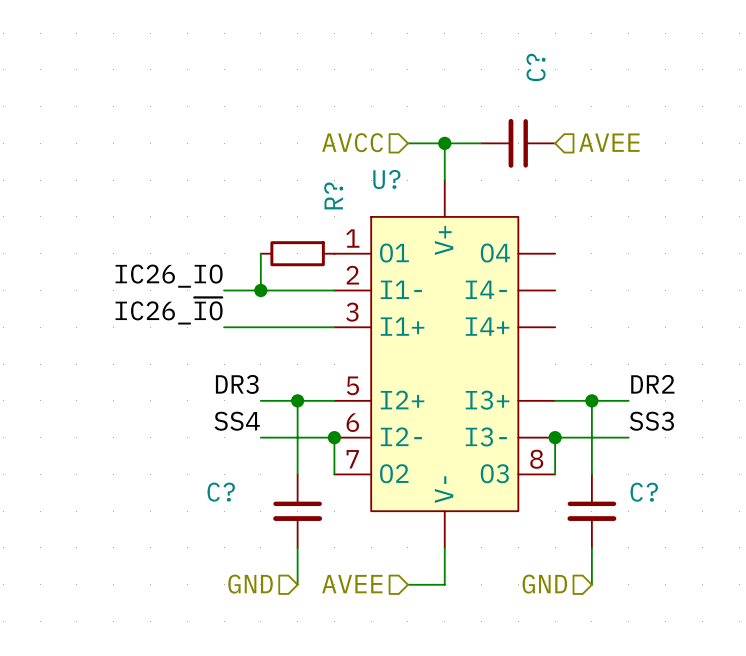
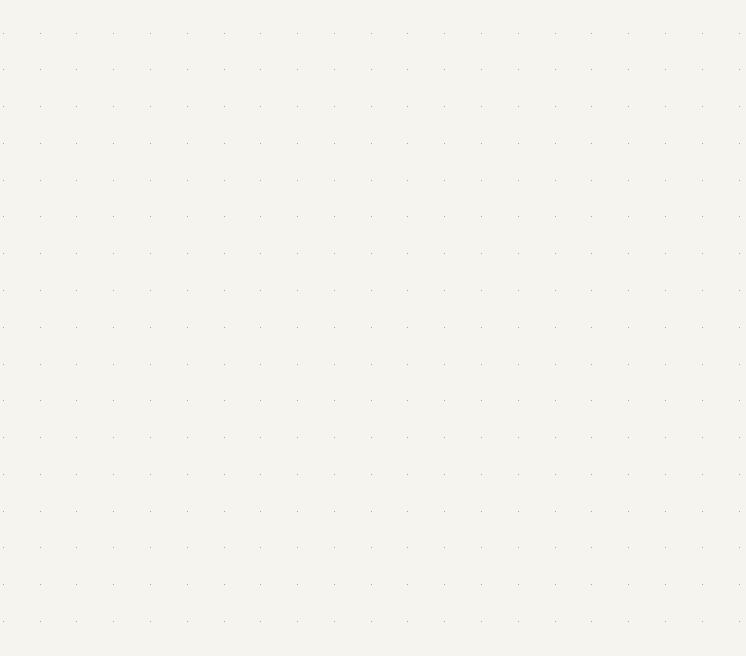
hierarchical label: AVCC (352, 142) -> none
hierarchical label: AVEE (609, 142) -> none
wire: (407, 143) (481, 143) -> none
wire: (444, 143) (444, 180) -> none
junction: (444, 143) -> none
C?: (518, 143) -> none
wire: (260, 253) (260, 290) -> none
R?: (297, 253) -> none
label: IC26_IO (169, 276) -> none
wire: (224, 290) (334, 290) -> none
junction: (260, 290) -> none
label: IC26_~{IO} (169, 310) -> none
wire: (224, 327) (334, 327) -> none
U?: (444, 364) -> none
label: DR3 (237, 384) -> none
label: DR2 (652, 384) -> none
wire: (260, 400) (334, 400) -> none
wire: (297, 400) (297, 474) -> none
junction: (297, 400) -> none
wire: (555, 400) (628, 400) -> none
wire: (591, 400) (591, 474) -> none
junction: (591, 400) -> none
label: SS4 (237, 421) -> none
label: SS3 (651, 421) -> none
wire: (260, 437) (334, 437) (334, 474) -> none
junction: (334, 437) -> none
junction: (555, 437) -> none
wire: (628, 437) (555, 437) (555, 474) -> none
C?: (297, 511) -> none
C?: (591, 511) -> none
wire: (297, 547) (297, 584) -> none
wire: (444, 547) (444, 584) (407, 584) -> none
wire: (591, 547) (591, 584) -> none
hierarchical label: GND (250, 584) -> none
hierarchical label: AVEE (352, 584) -> none
hierarchical label: GND (544, 584) -> none

